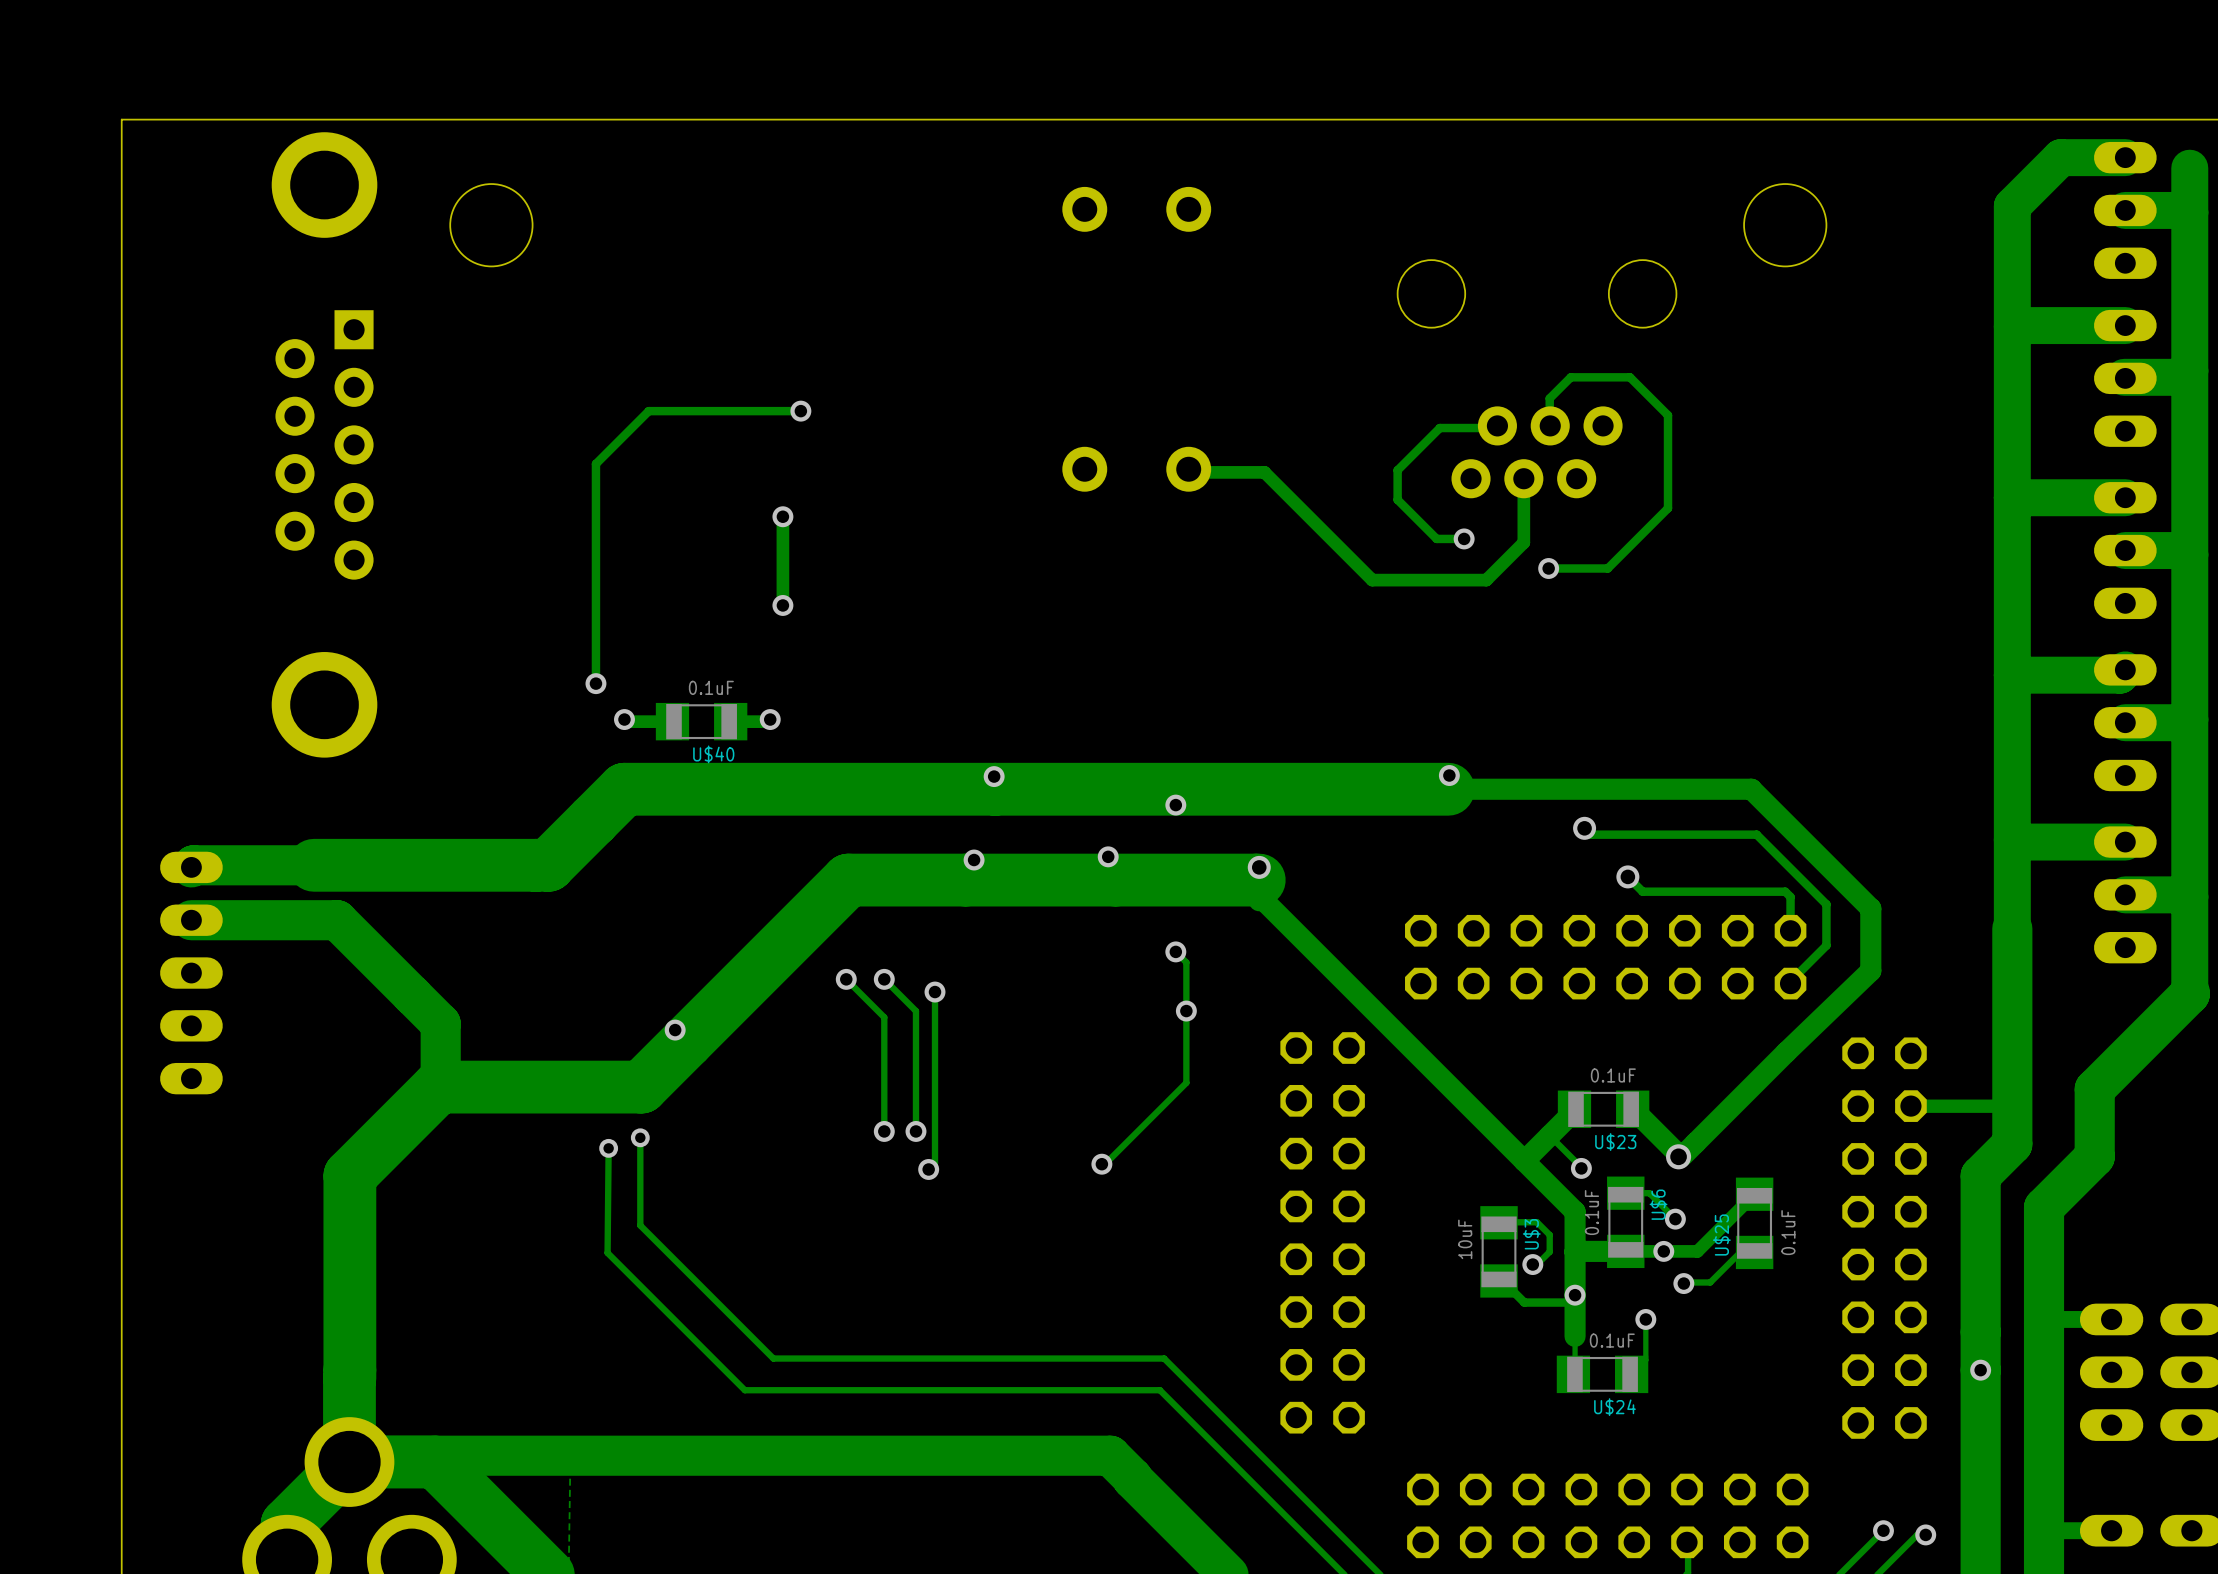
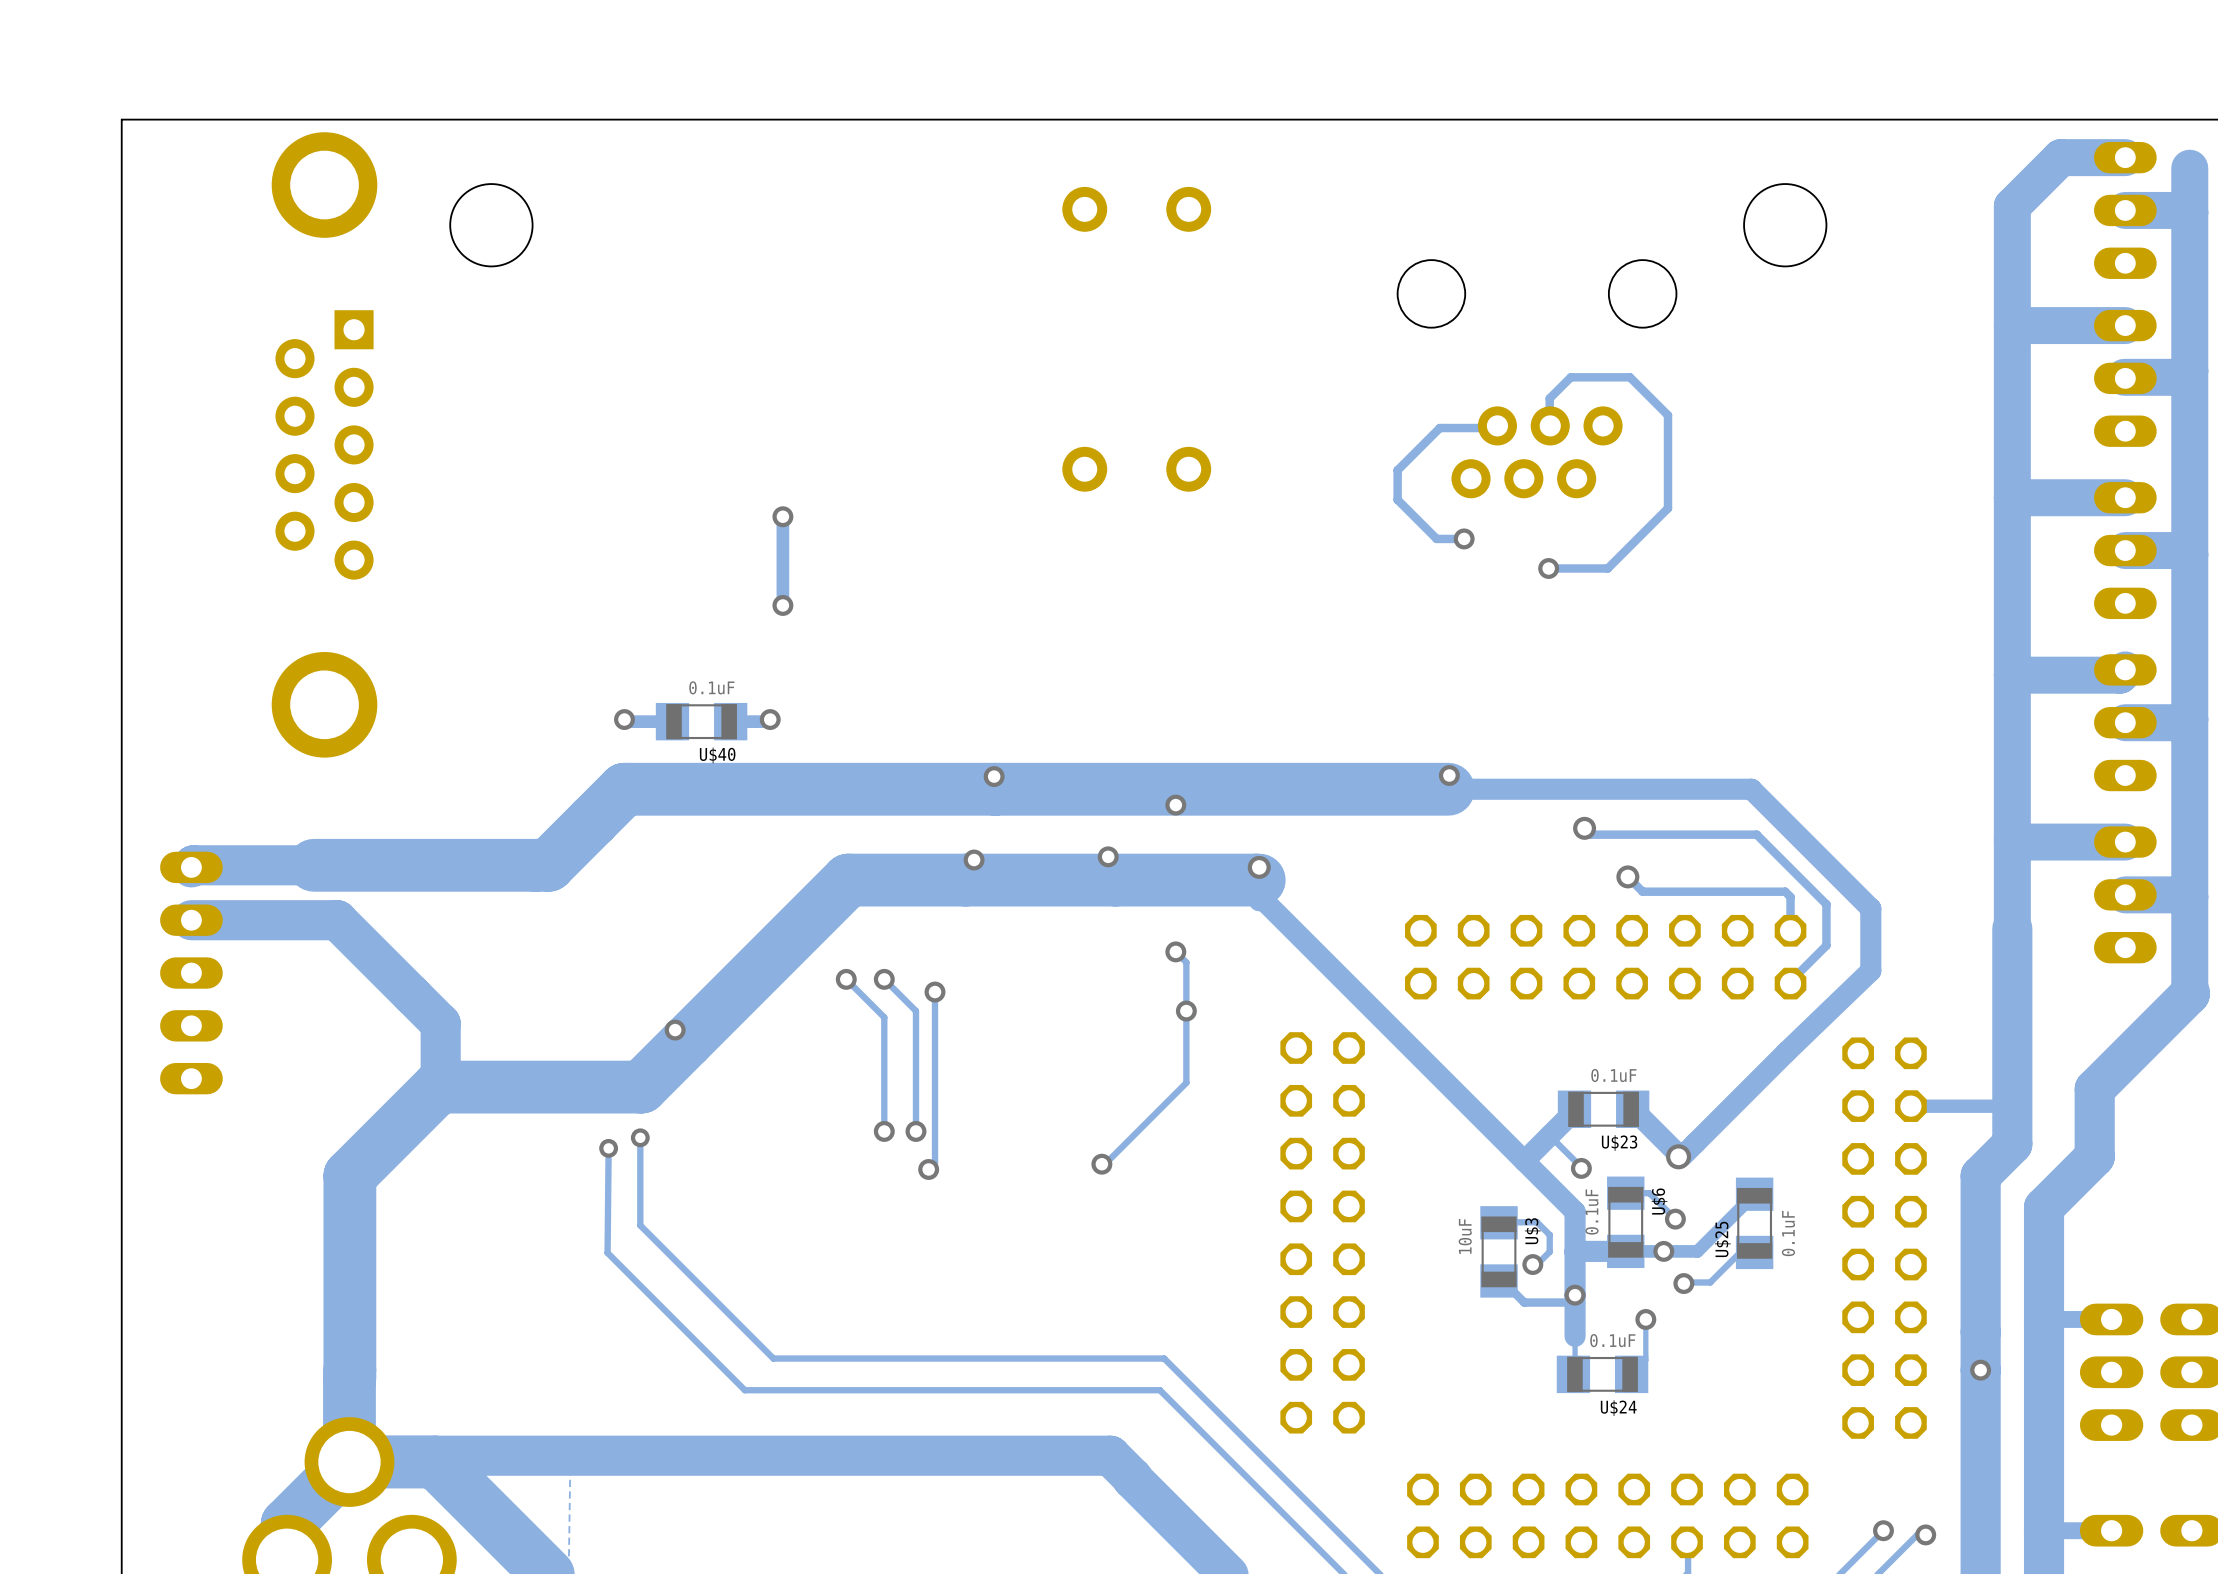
track: (800, 411) (648, 411) (595, 463) (595, 683) -> none
via: (800, 411) -> none
track: (1188, 469) (1191, 472) (1264, 472) (1372, 580) (1486, 580) (1523, 542) (1523, 478) -> none
via: (595, 683) -> none

